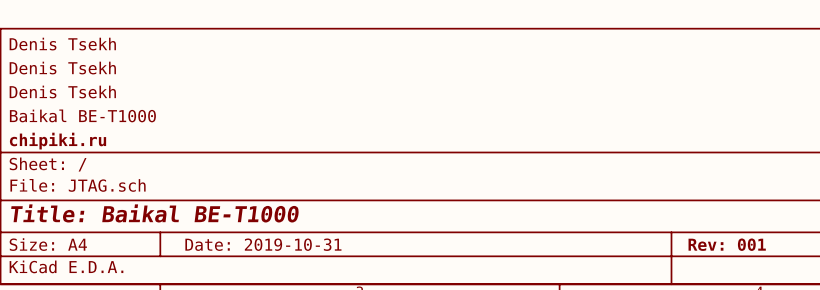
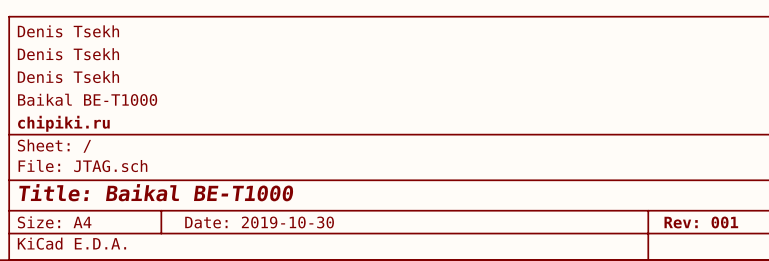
title block: Date: 2019-10-31 (263, 244) -> Date: 2019-10-30 (259, 222)

